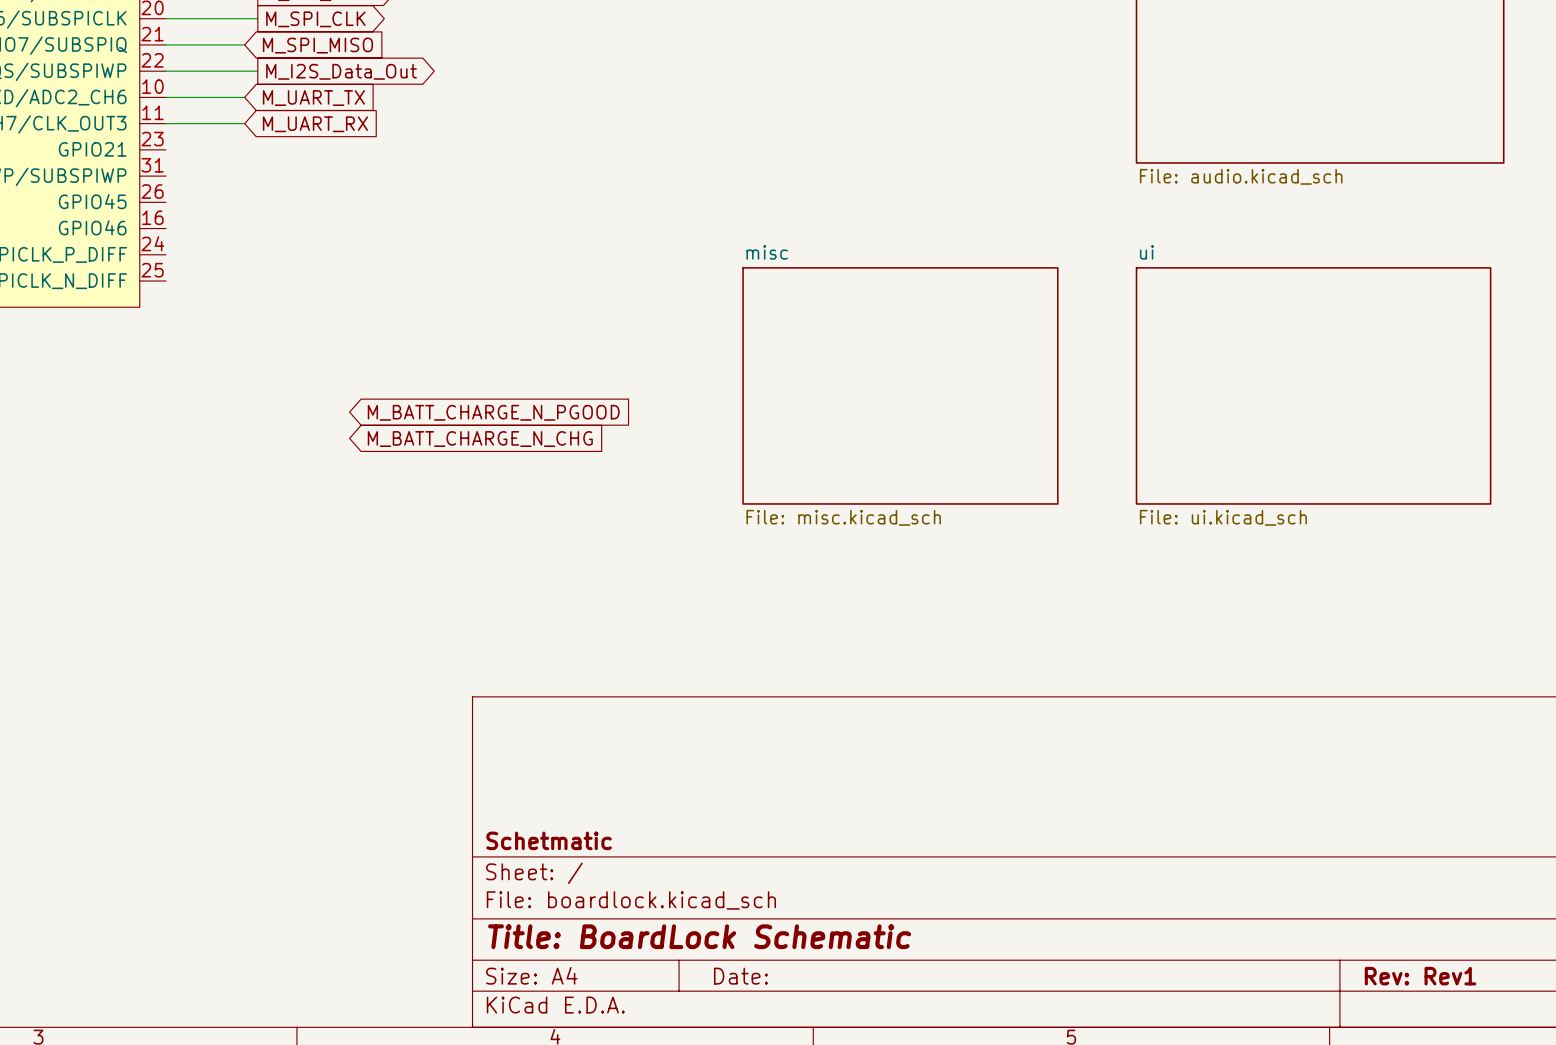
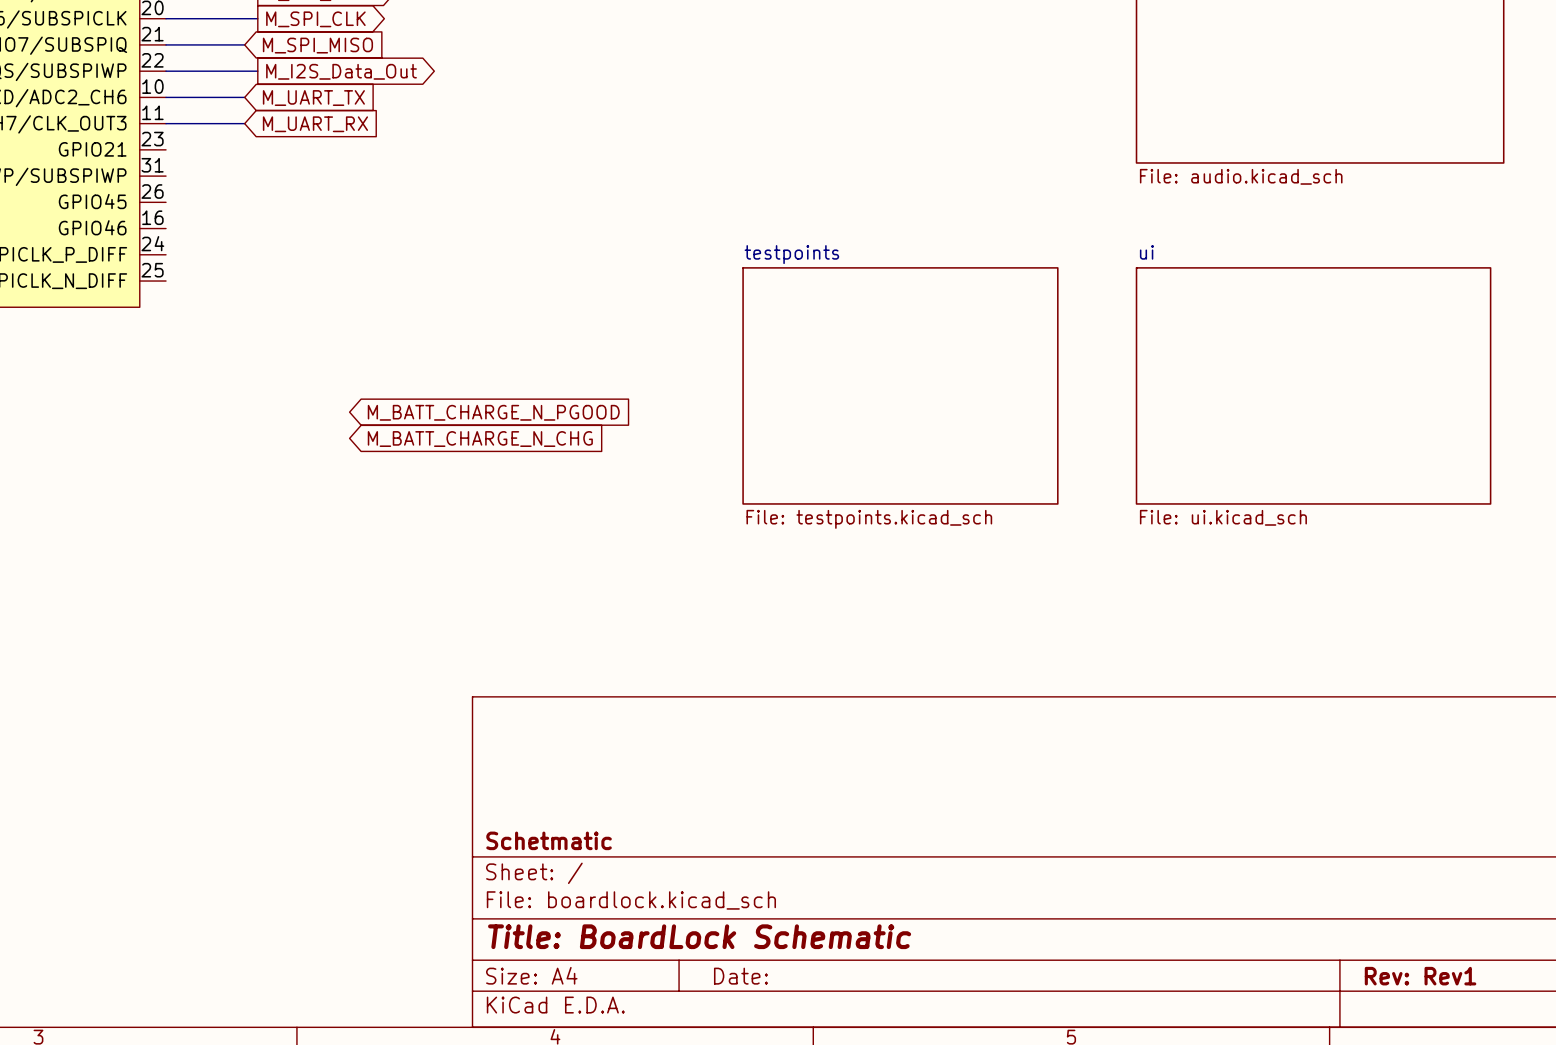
sheet misc name: misc (767, 252) -> testpoints (791, 254)
sheet misc value: File: misc.kicad_sch (843, 517) -> File: testpoints.kicad_sch (869, 519)

